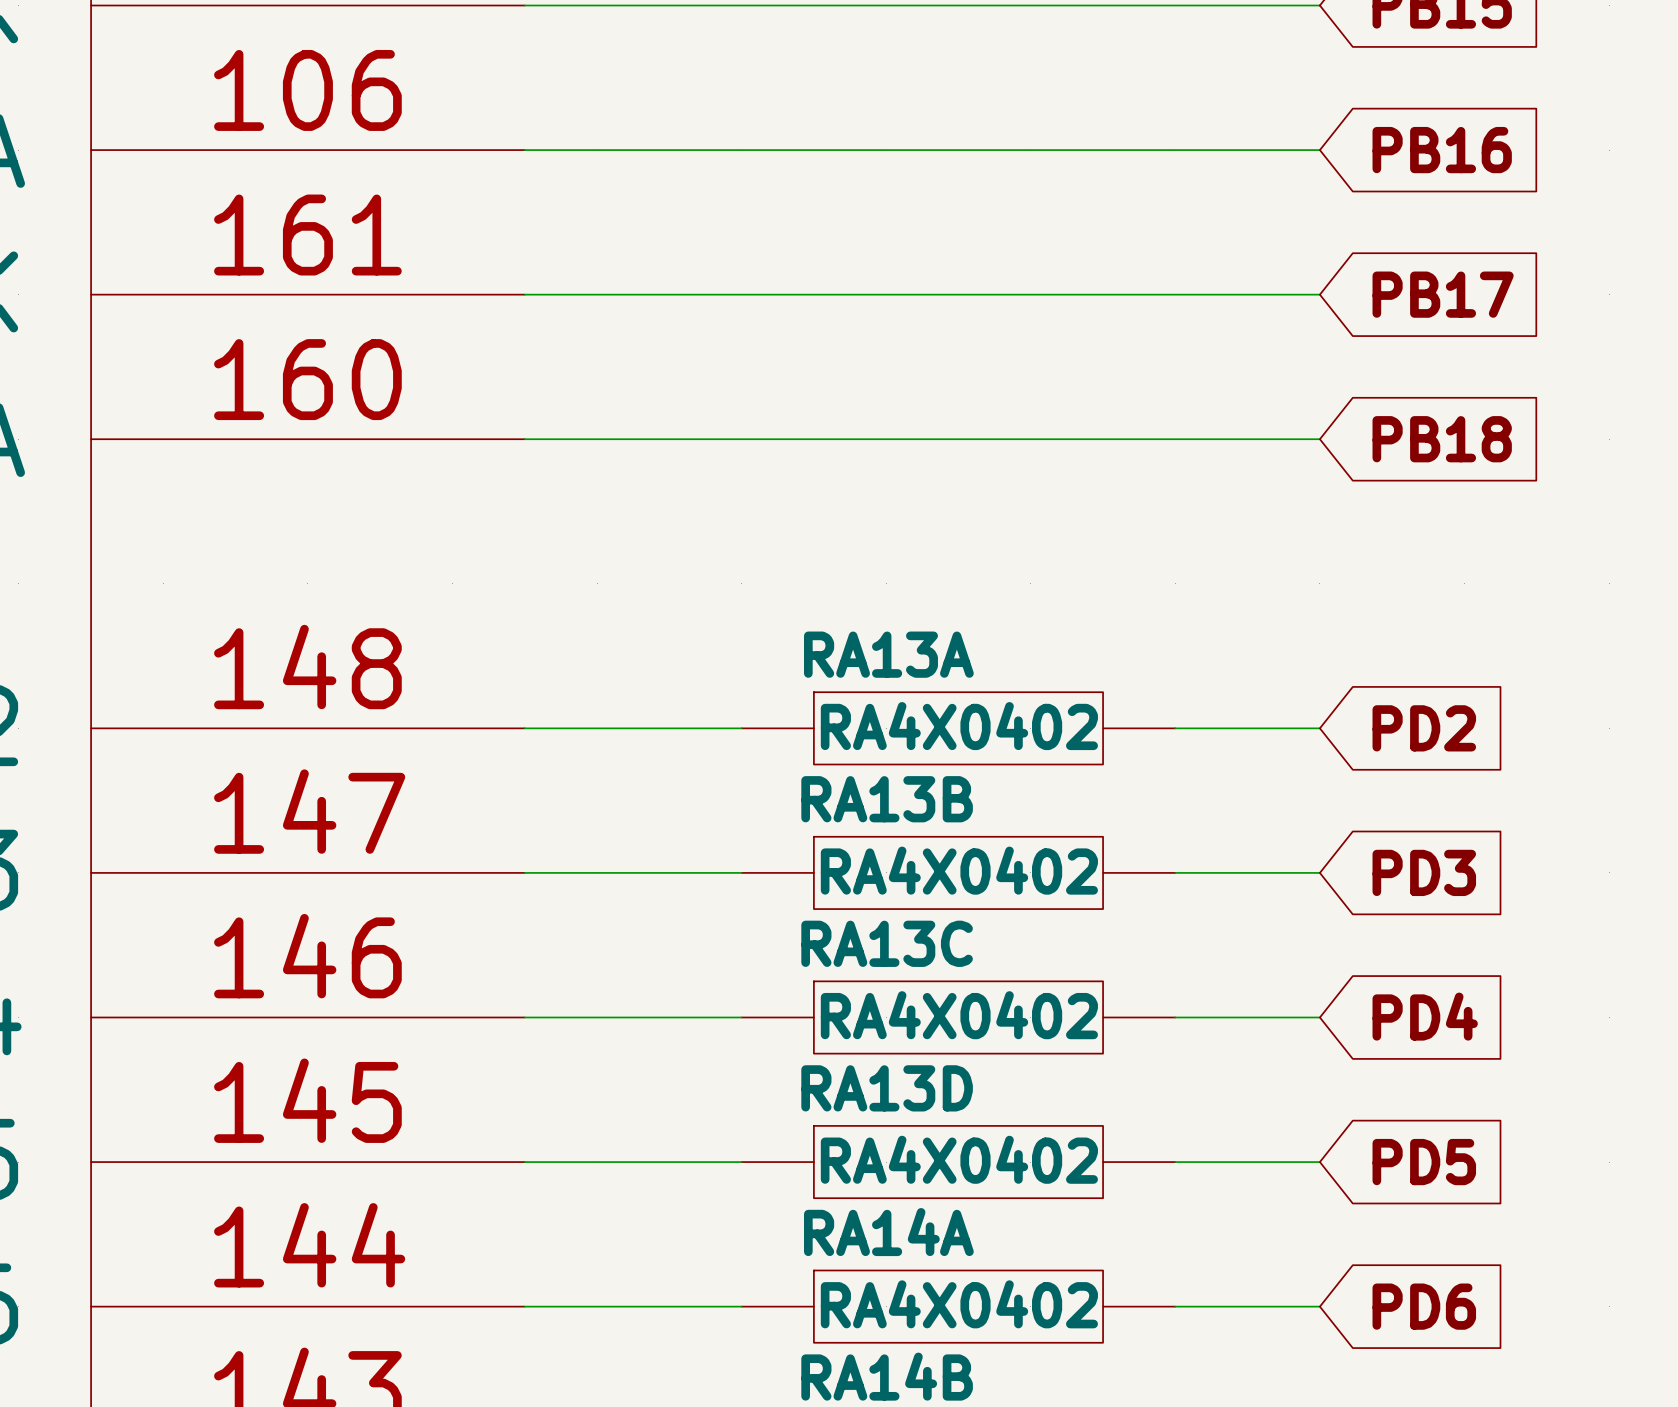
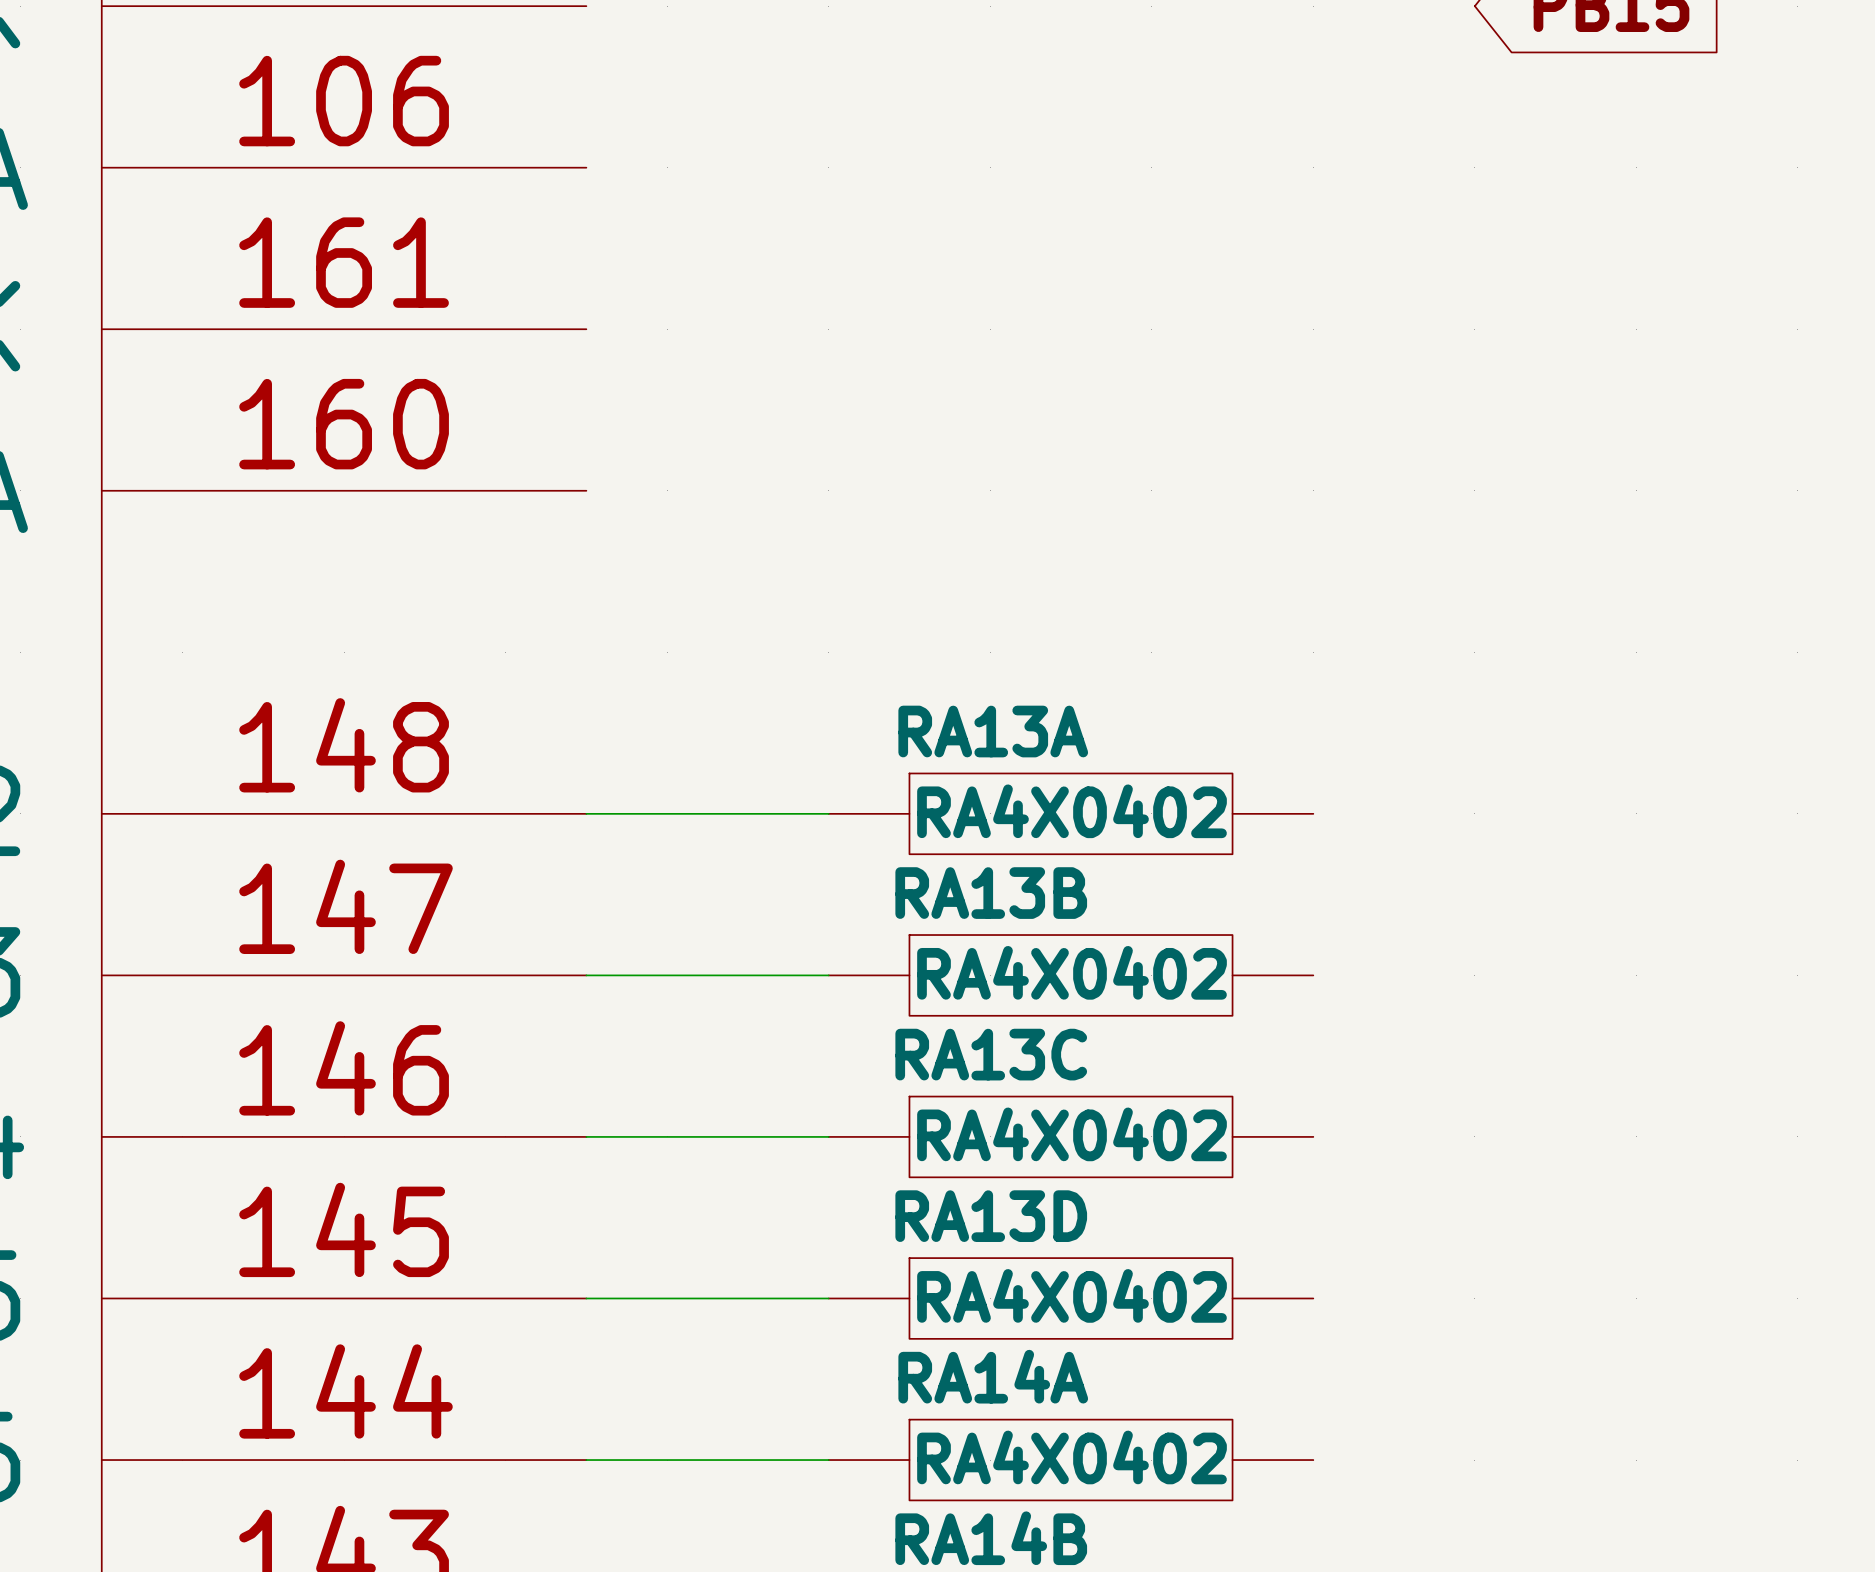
wire: (524, 5) (1319, 5) -> none
wire: (524, 150) (1319, 150) -> none
global label: PB16 (1442, 150) -> none
wire: (524, 294) (1319, 294) -> none
global label: PB17 (1443, 294) -> none
wire: (524, 439) (1319, 439) -> none
global label: PB18 (1442, 439) -> none
wire: (1175, 728) (1319, 728) -> none
global label: PD2 (1424, 728) -> none
wire: (1175, 872) (1319, 872) -> none
global label: PD3 (1424, 872) -> none
global label: PD4 (1425, 1016) -> none
wire: (1175, 1017) (1319, 1017) -> none
wire: (1175, 1162) (1319, 1162) -> none
global label: PD5 (1424, 1162) -> none
wire: (1175, 1306) (1319, 1306) -> none
global label: PD6 (1424, 1306) -> none

